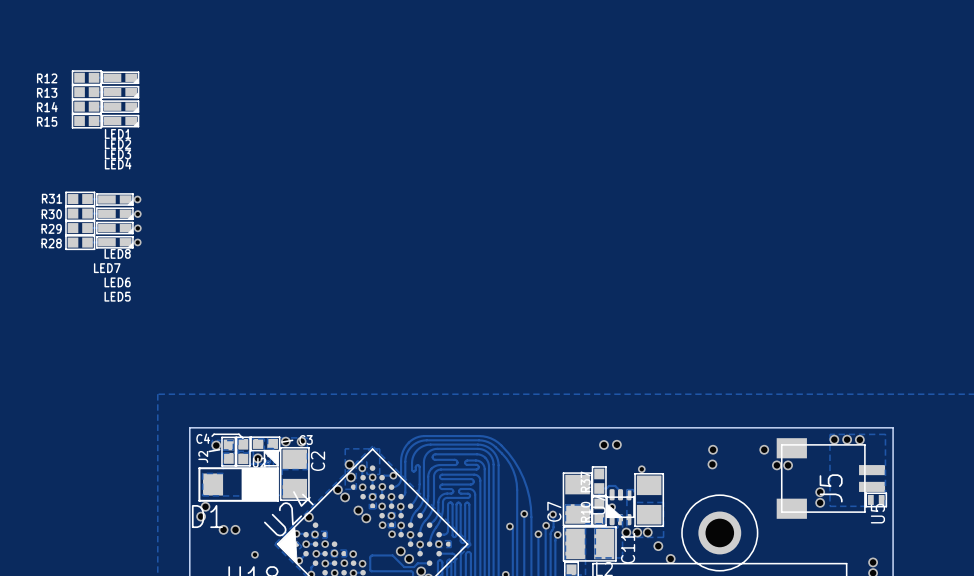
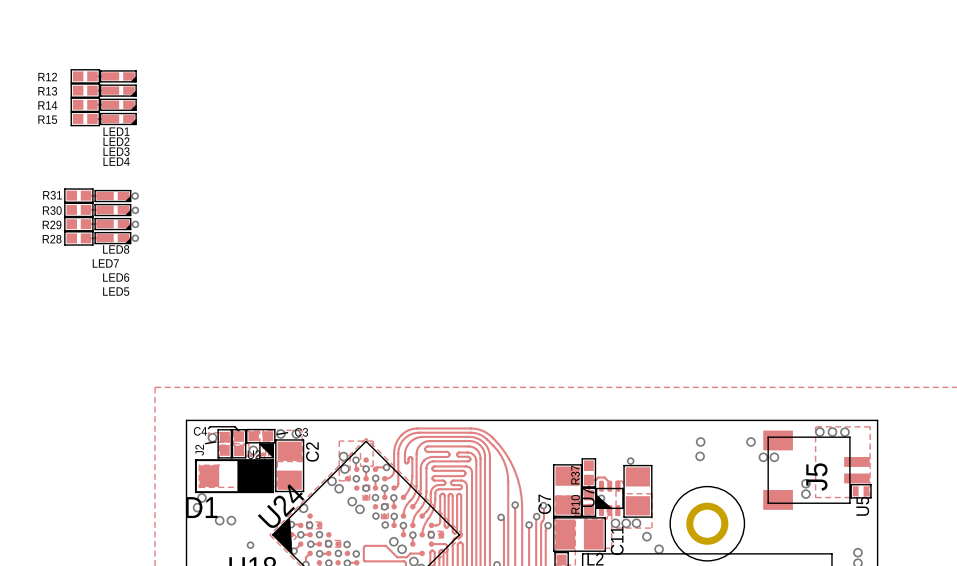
via: (603, 444) -> none
via: (616, 444) -> none

